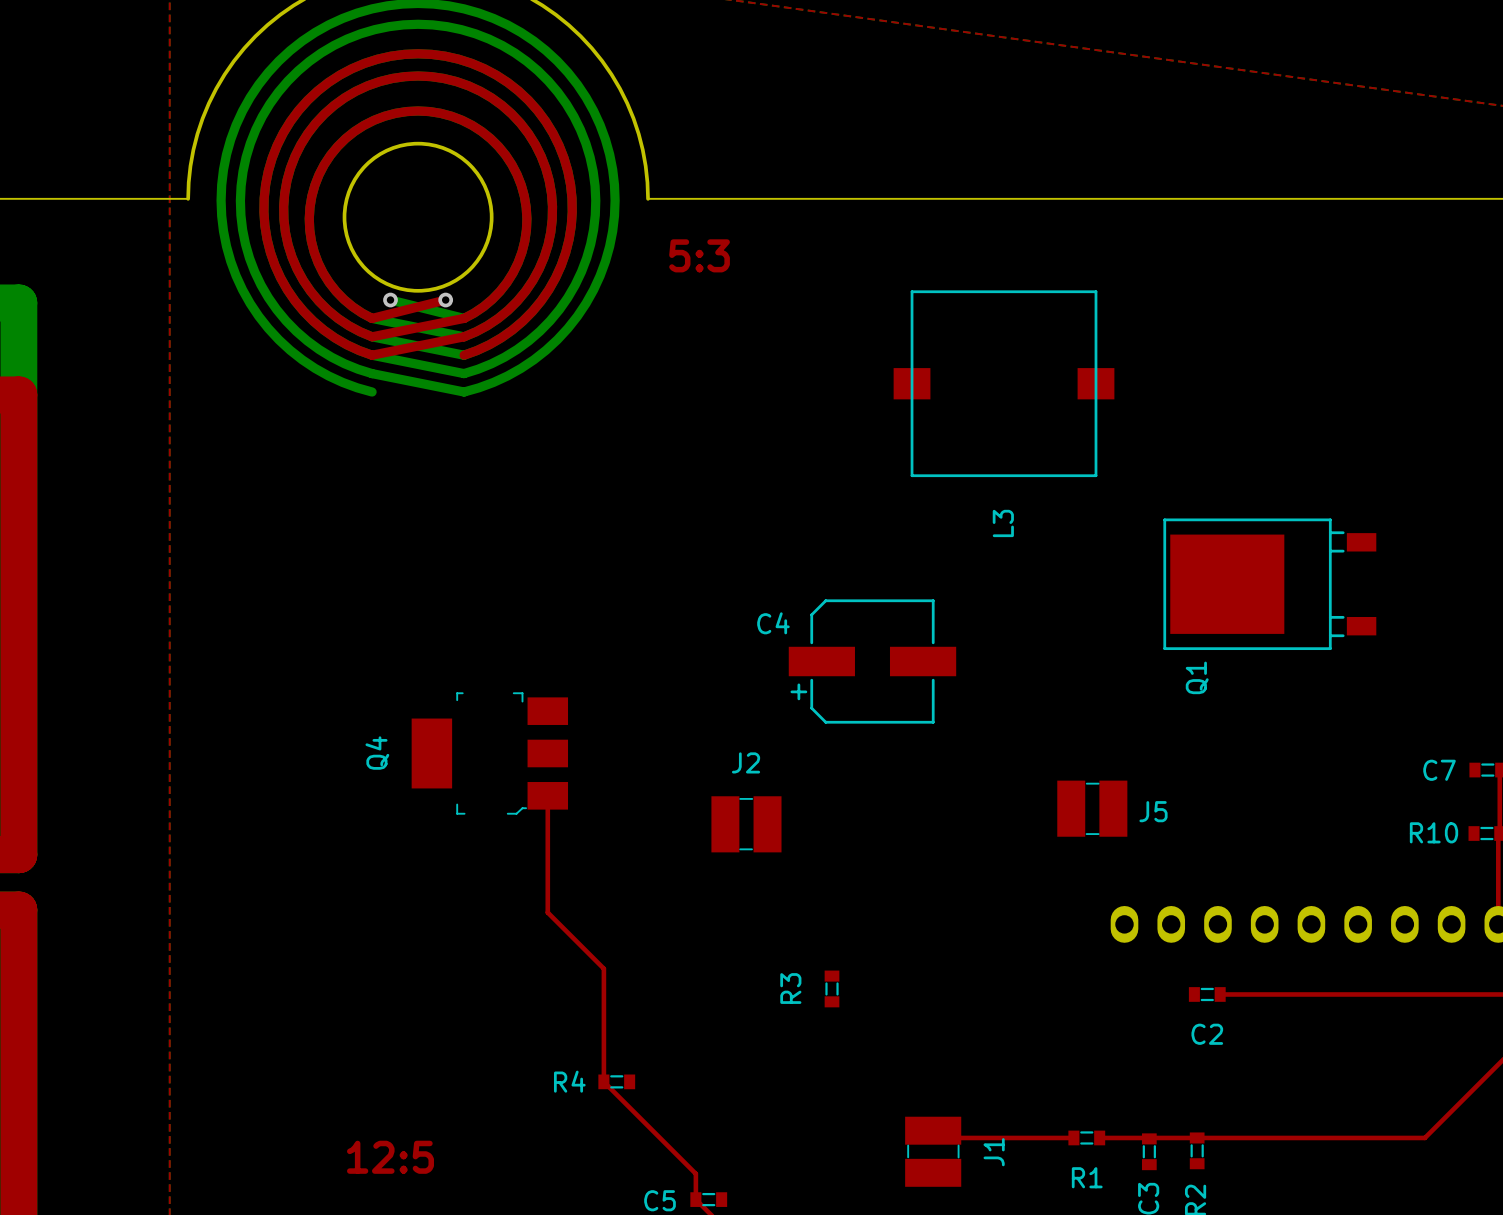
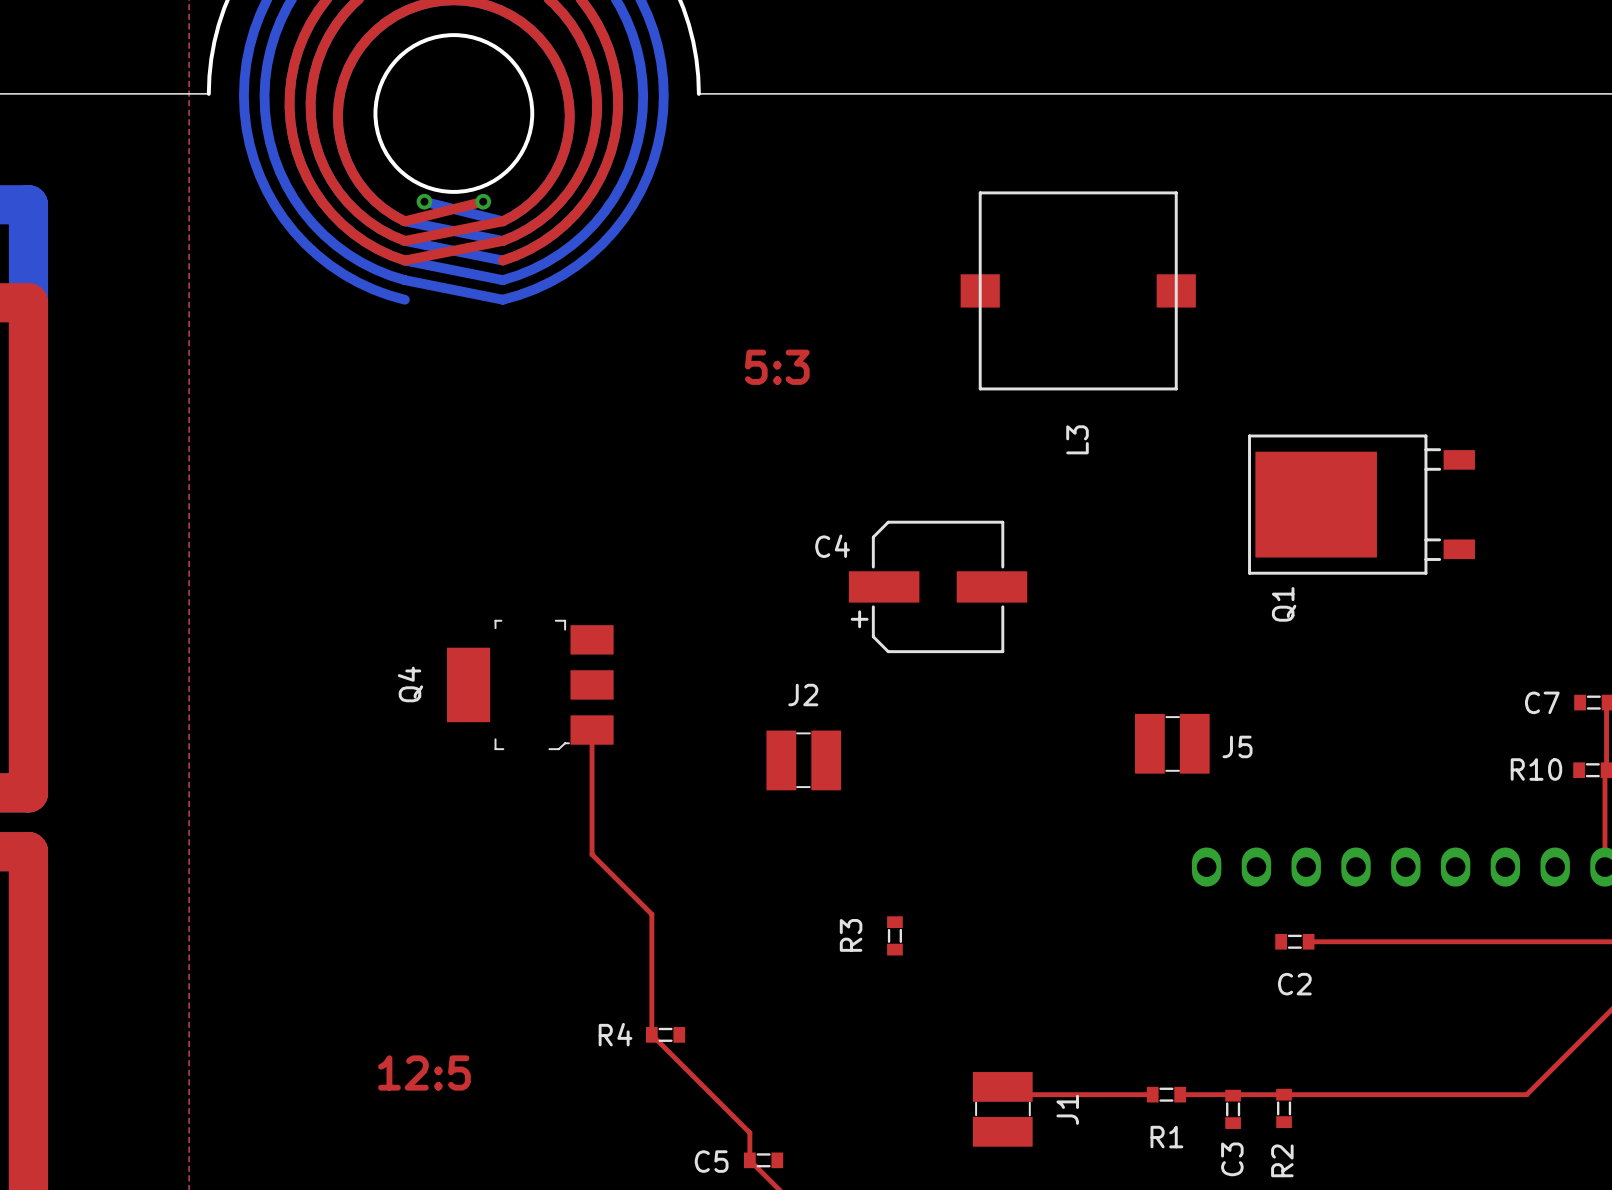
text position: 5:3 (699, 255) -> 5:3 (777, 367)
text position: 12:5 (390, 1157) -> 12:5 (424, 1072)

